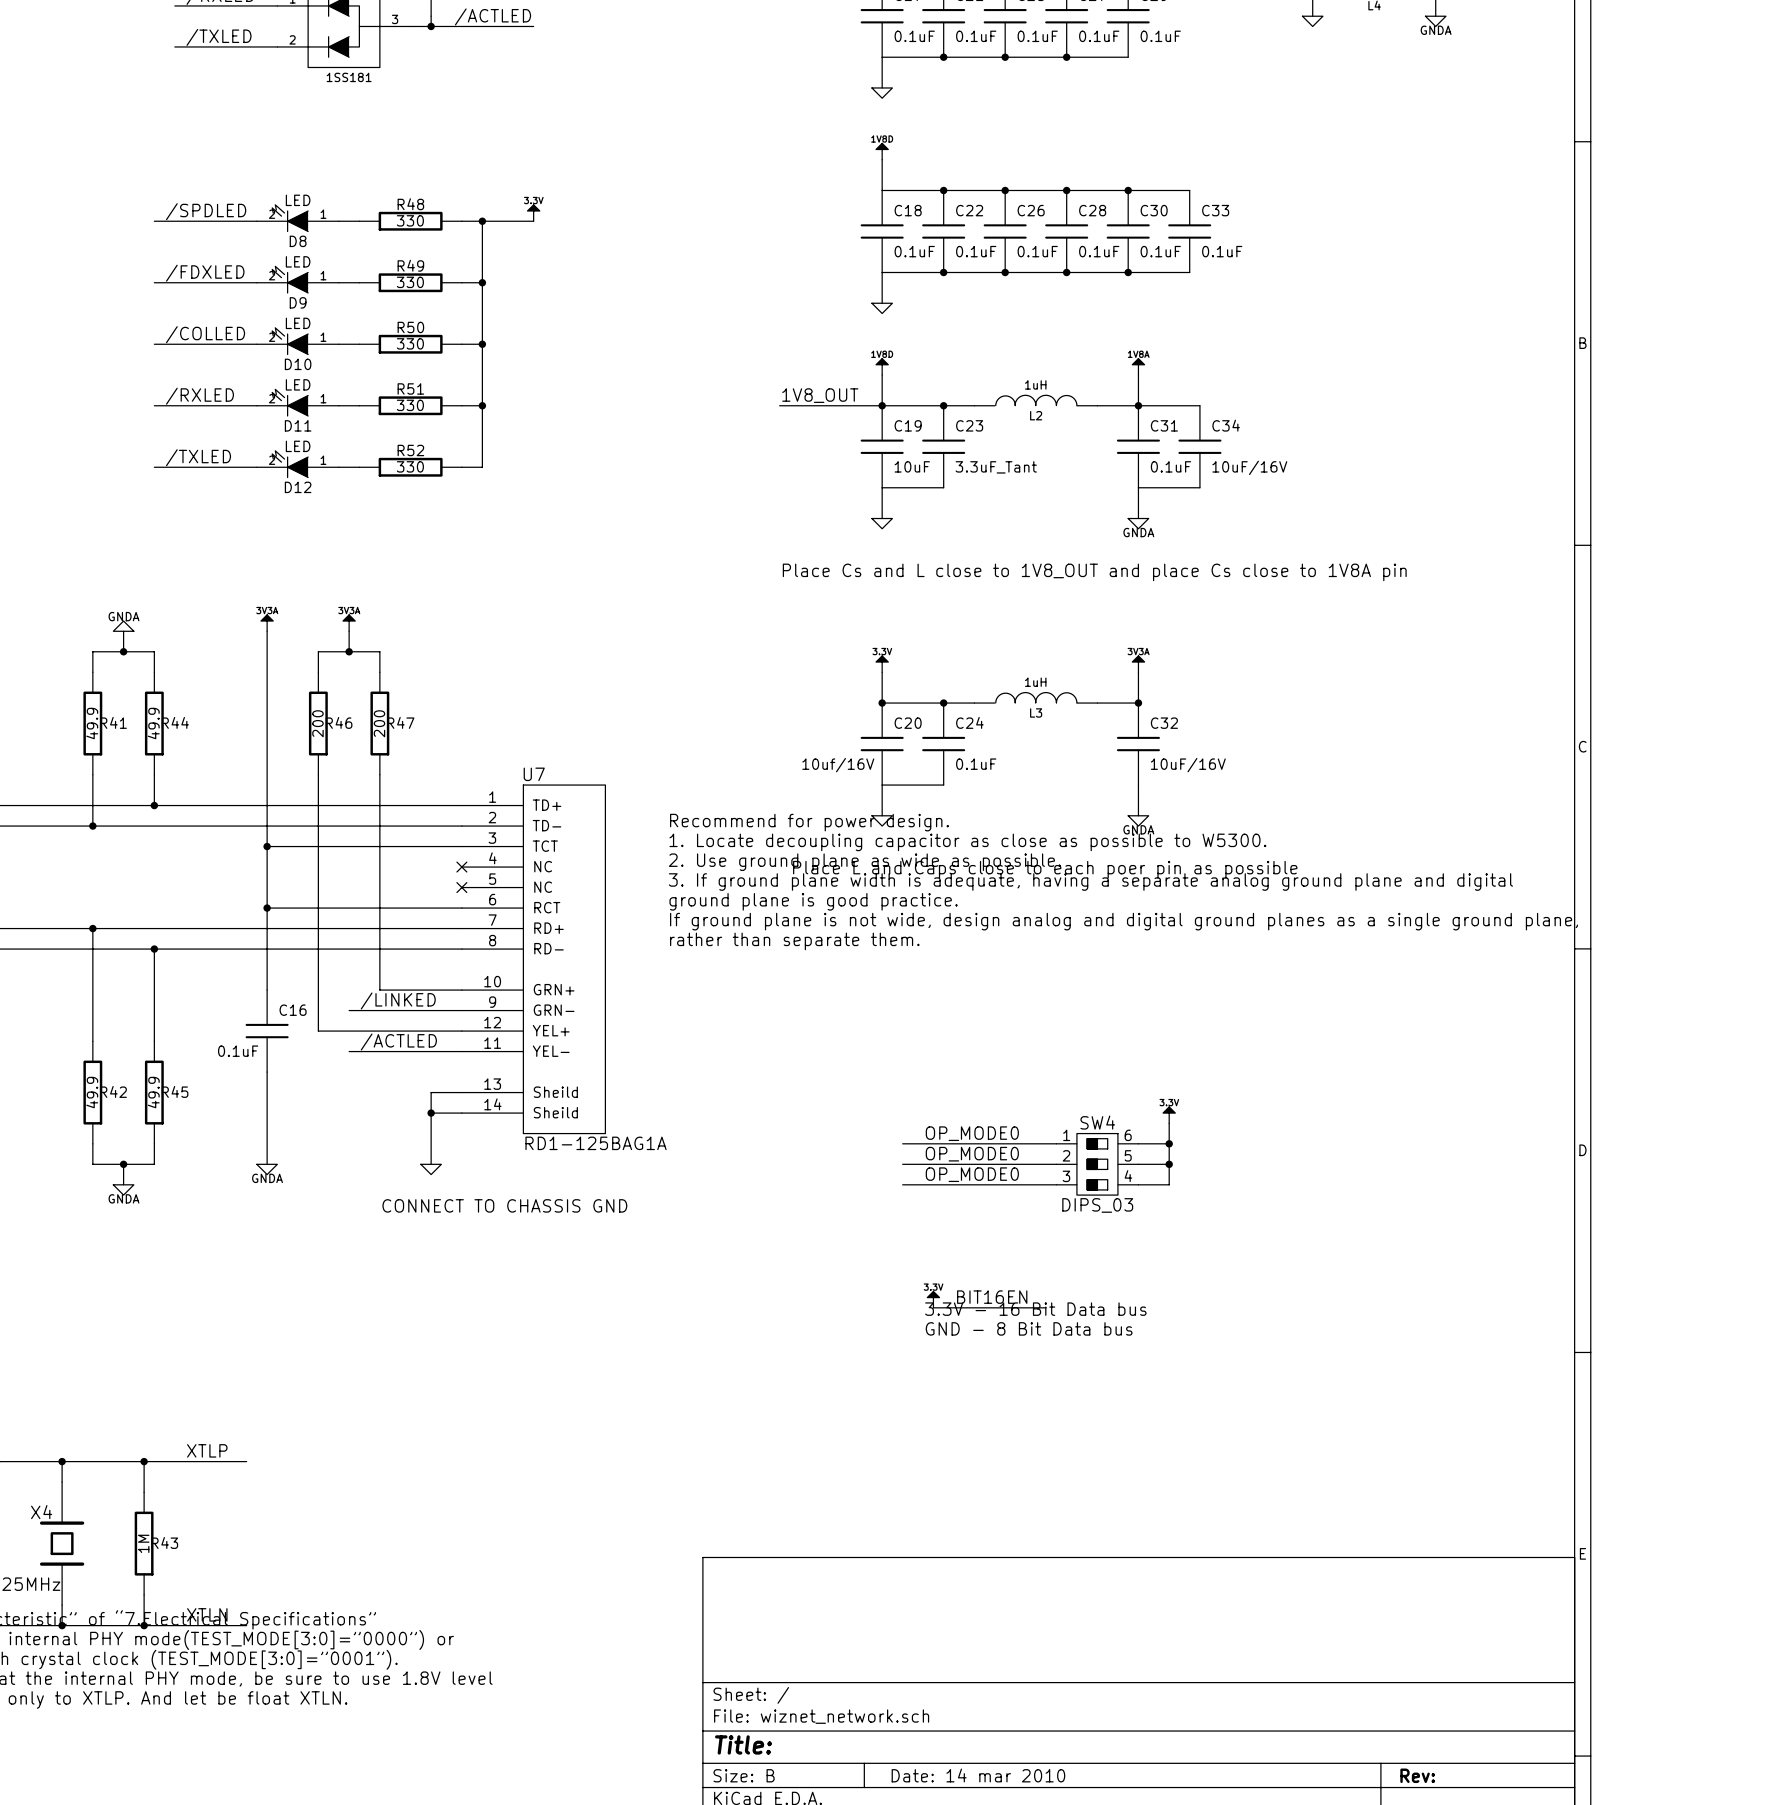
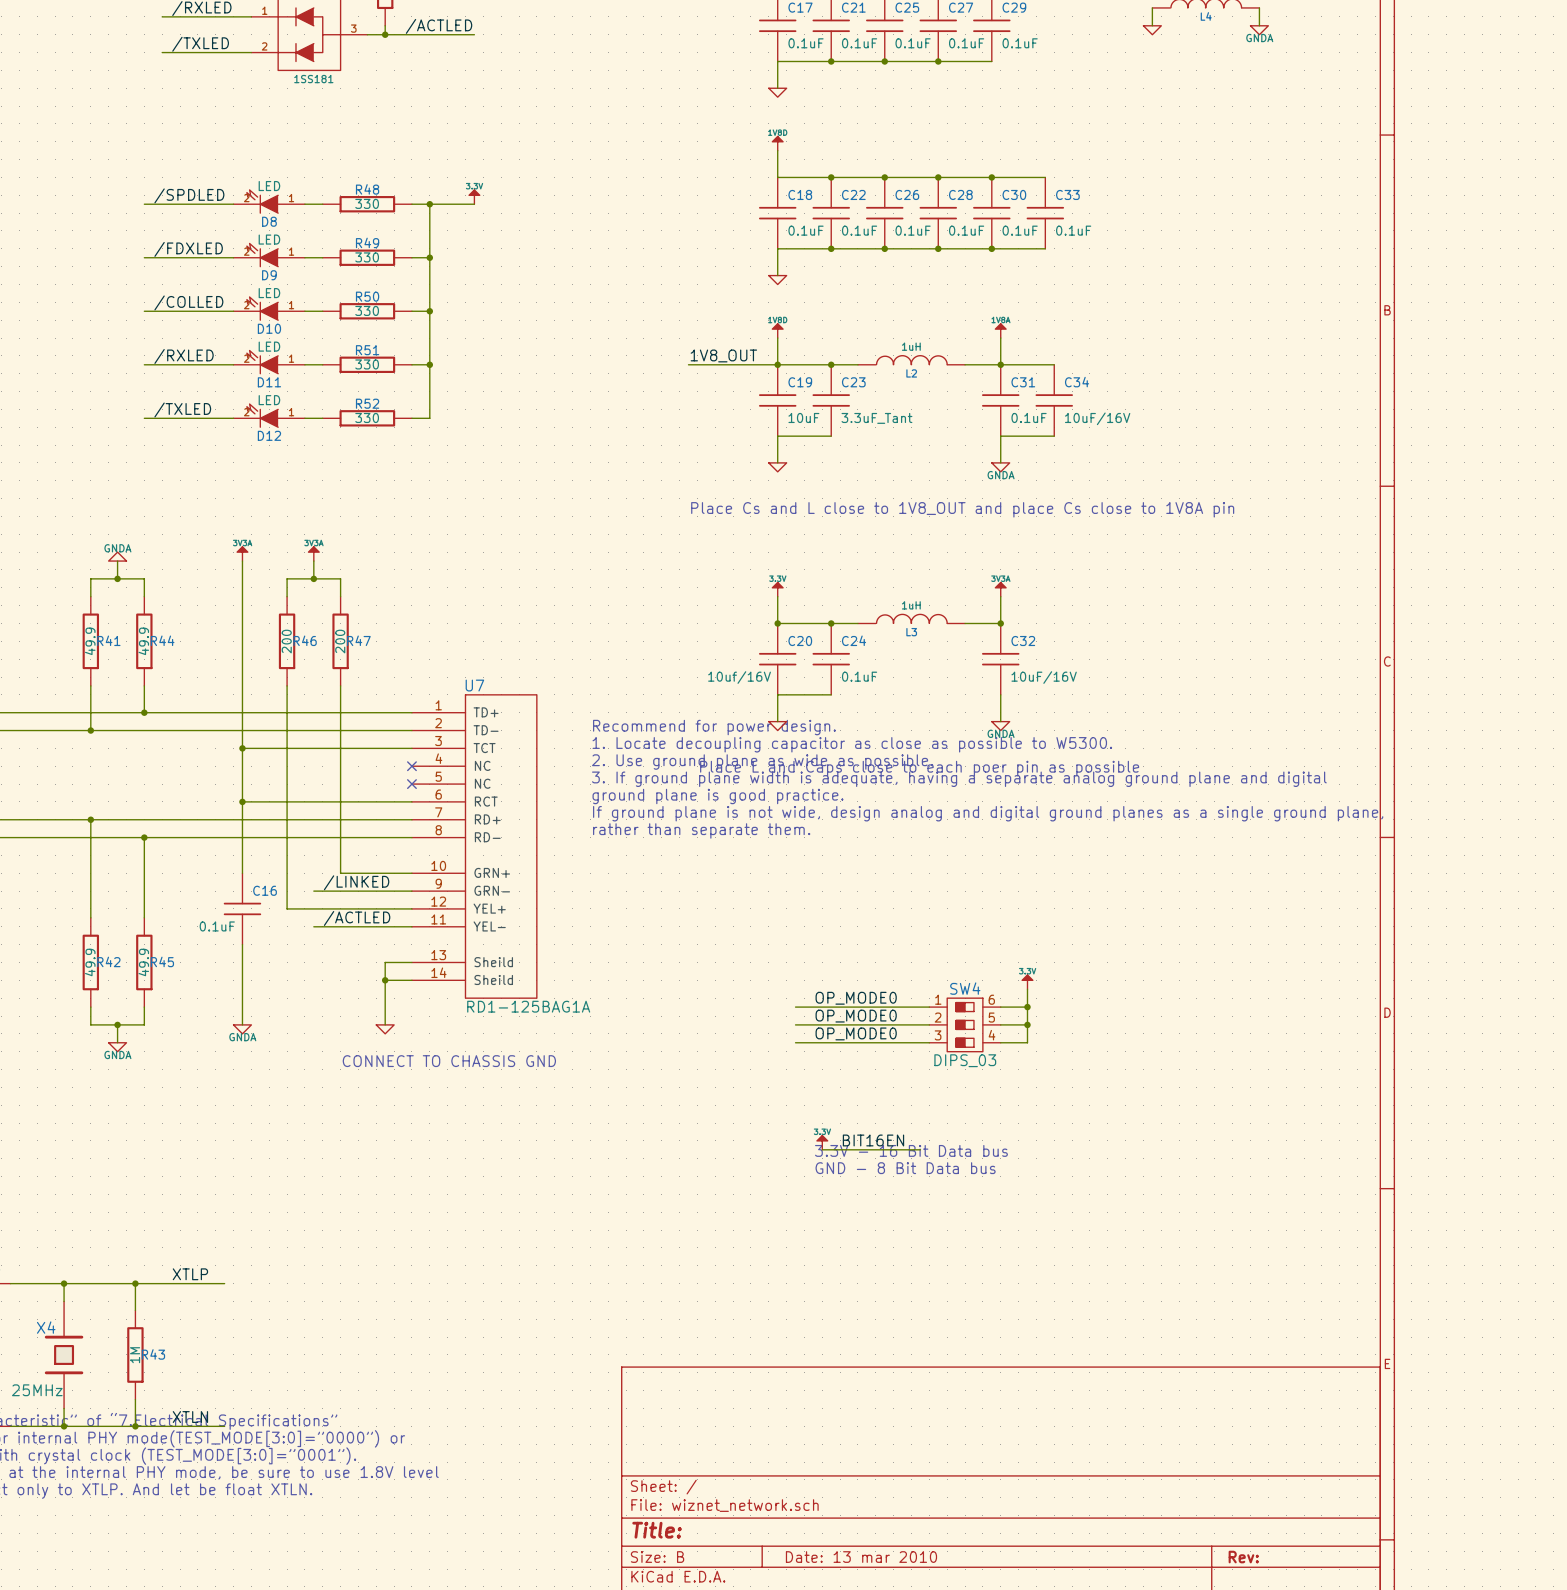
title block: Date: 14 mar 2010 (978, 1775) -> Date: 13 mar 2010 (861, 1557)

